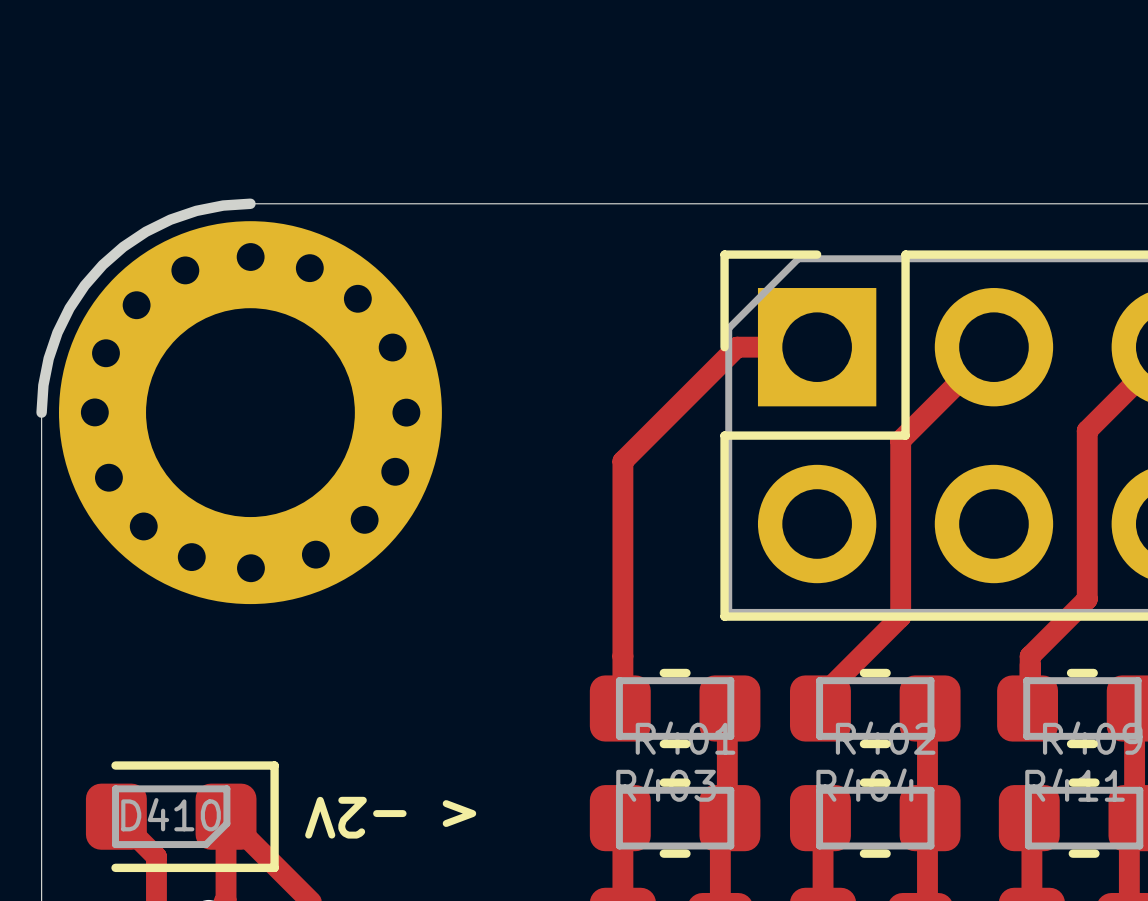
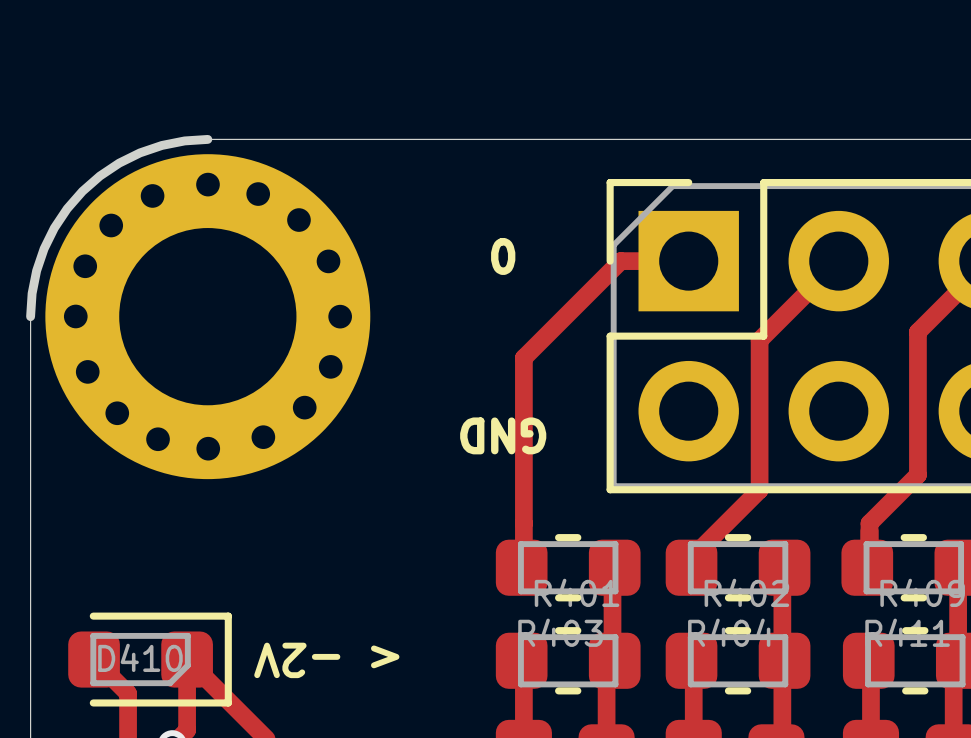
text: none -> 0 (503, 256)
text: none -> GND (503, 435)

